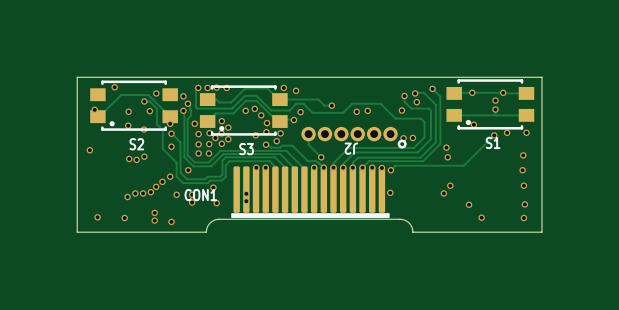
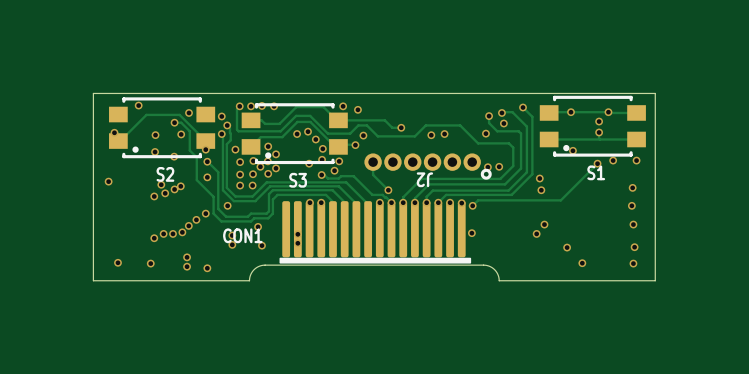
via: none -> (161, 184)
via: none -> (180, 186)
via: (129, 158) -> none
via: none -> (154, 196)
via: (176, 194) -> none

